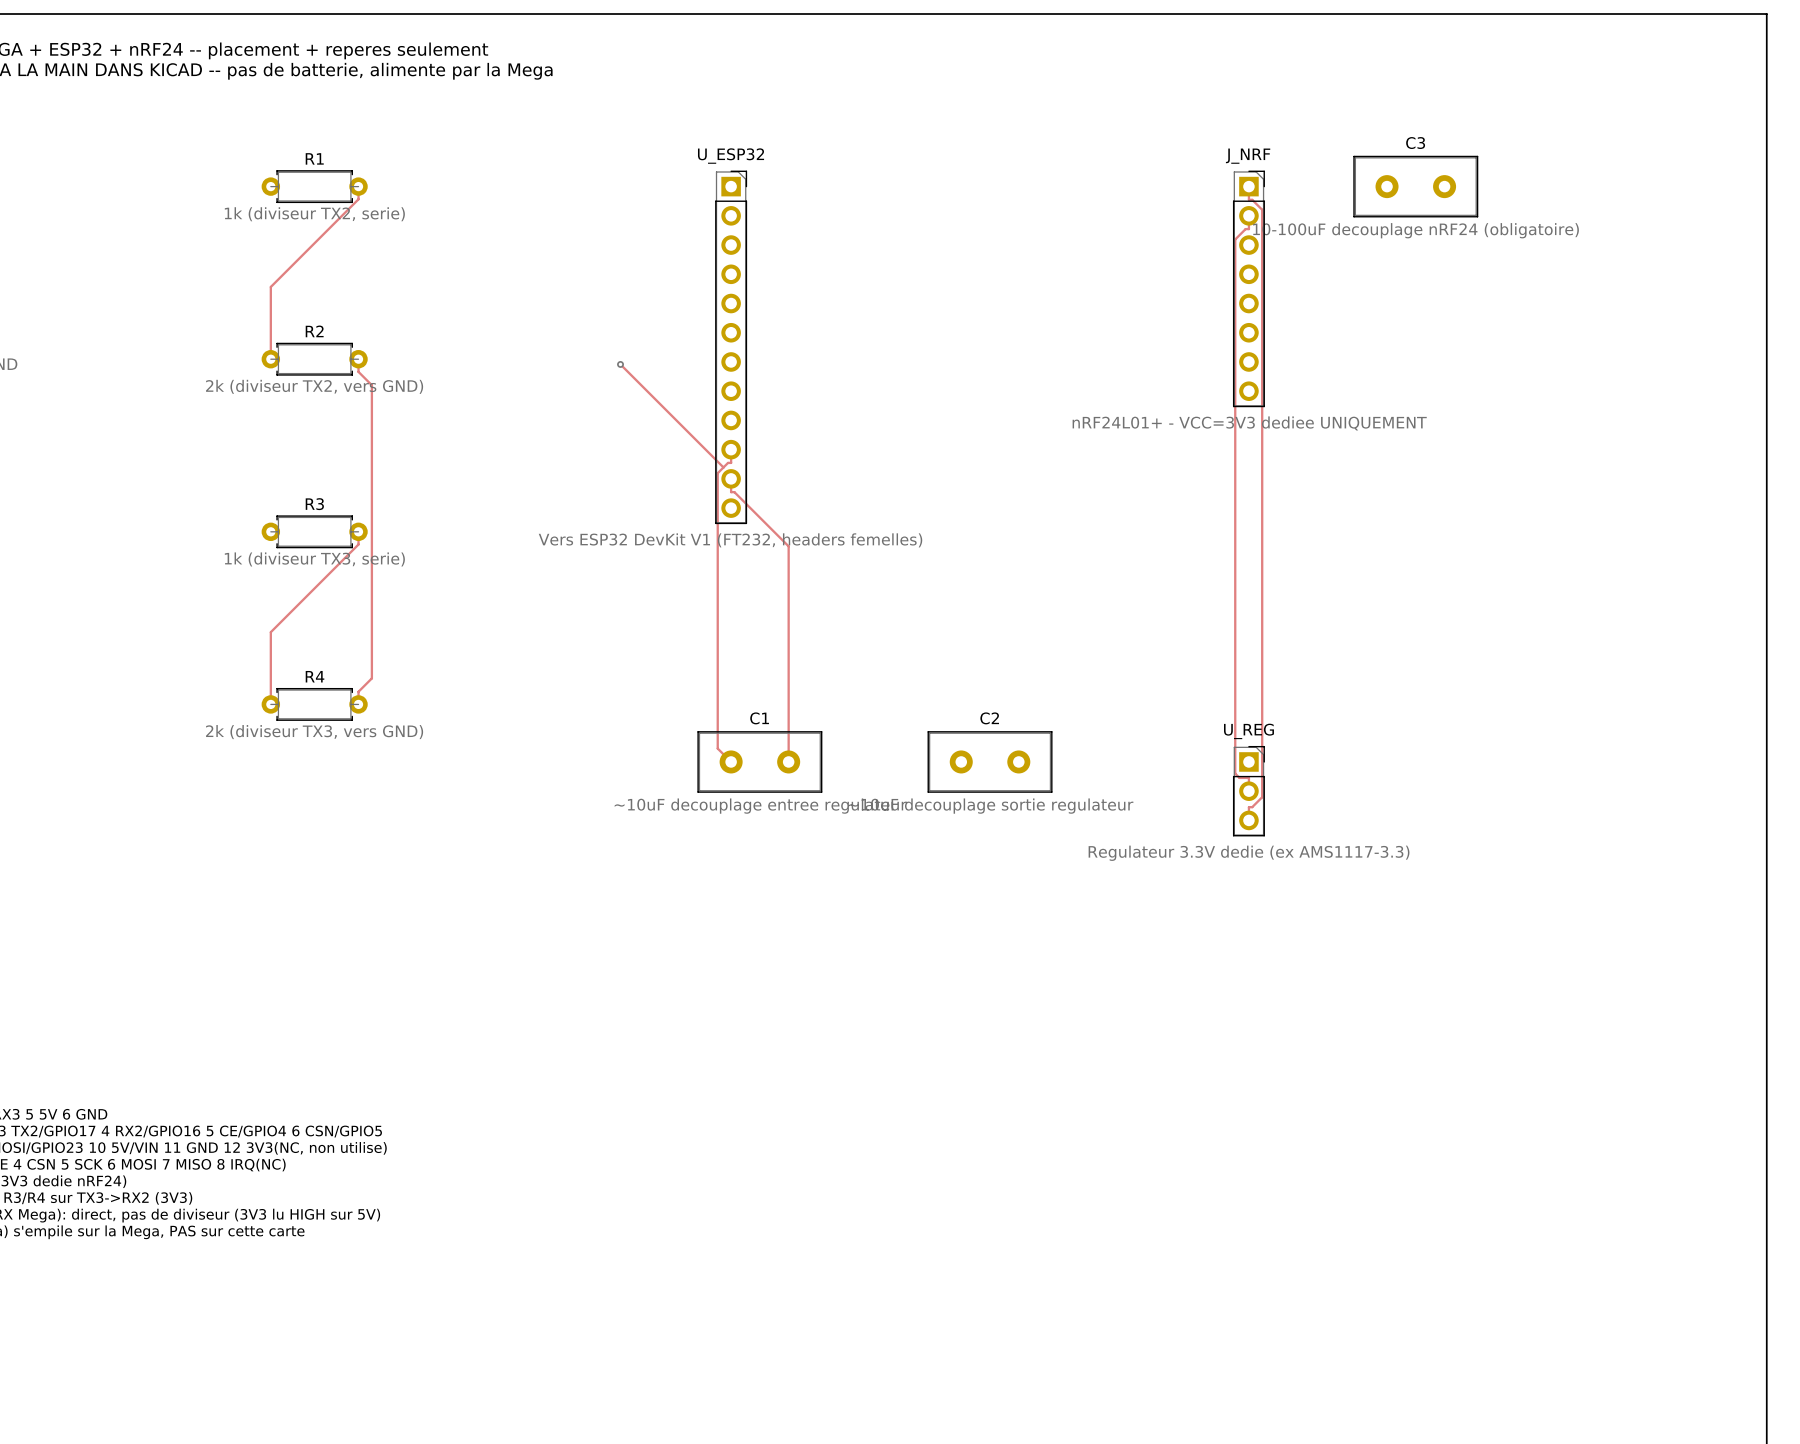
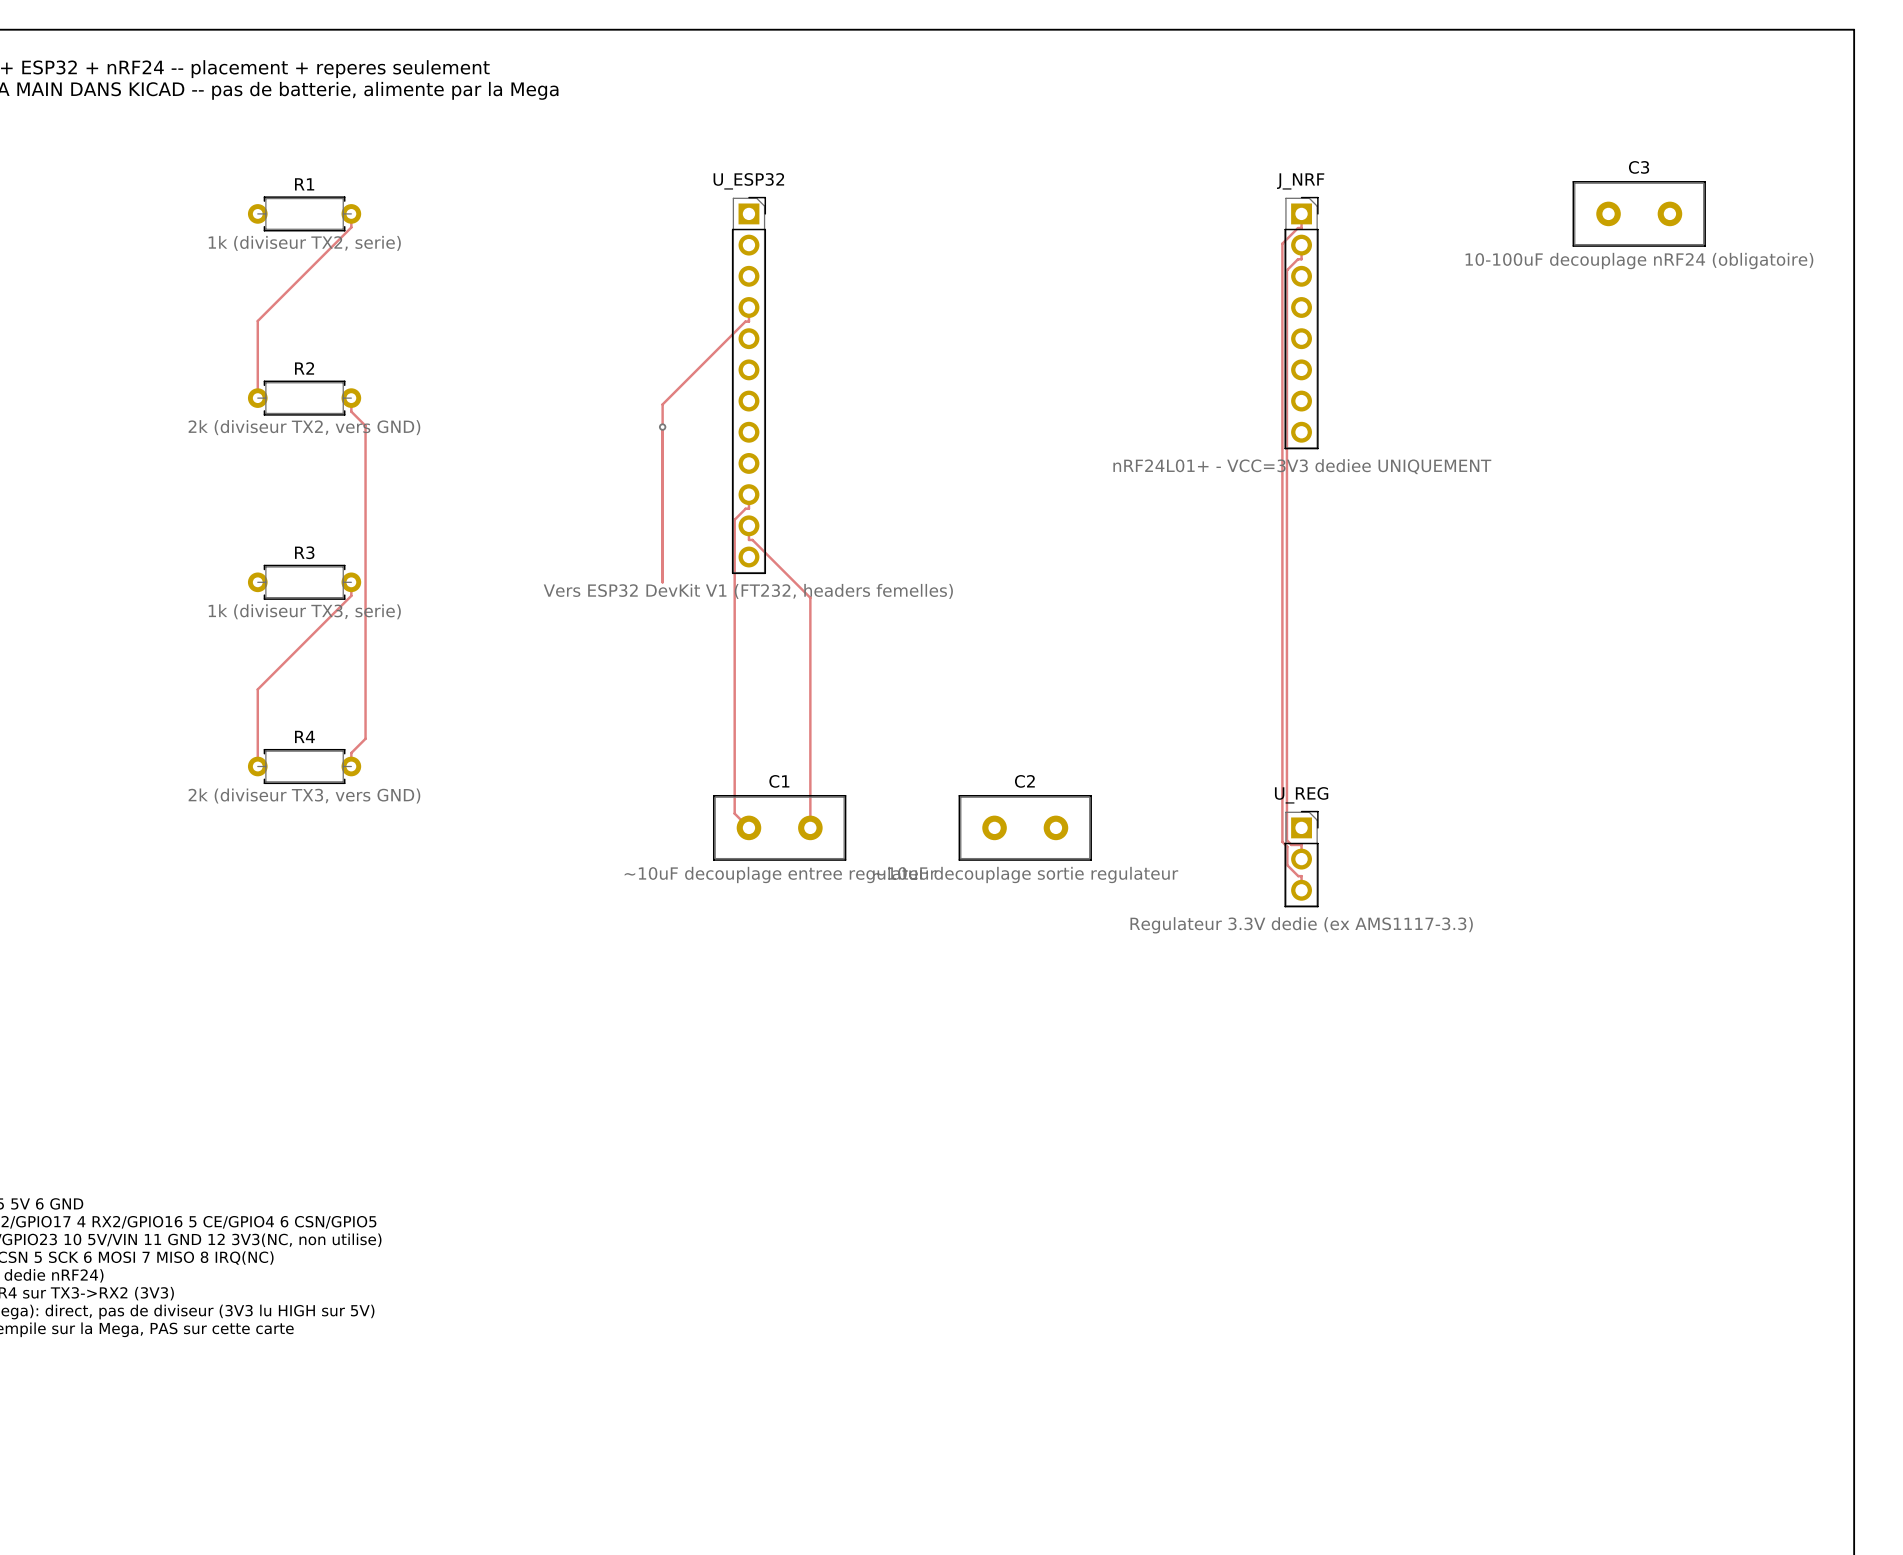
C3 position: (1415, 186) -> (1639, 213)
track: (1248, 199) (1252, 199) (1262, 209) (1262, 797) (1252, 807) (1248, 807) -> (1301, 228) (1298, 228) (1282, 243) (1282, 841) (1287, 846) (1287, 865) (1298, 876) (1301, 876)
track: none -> (748, 307) (748, 321) (745, 321) (662, 404) (662, 582)
track: (620, 364) (723, 467) -> none
via position: (620, 364) -> (662, 427)

